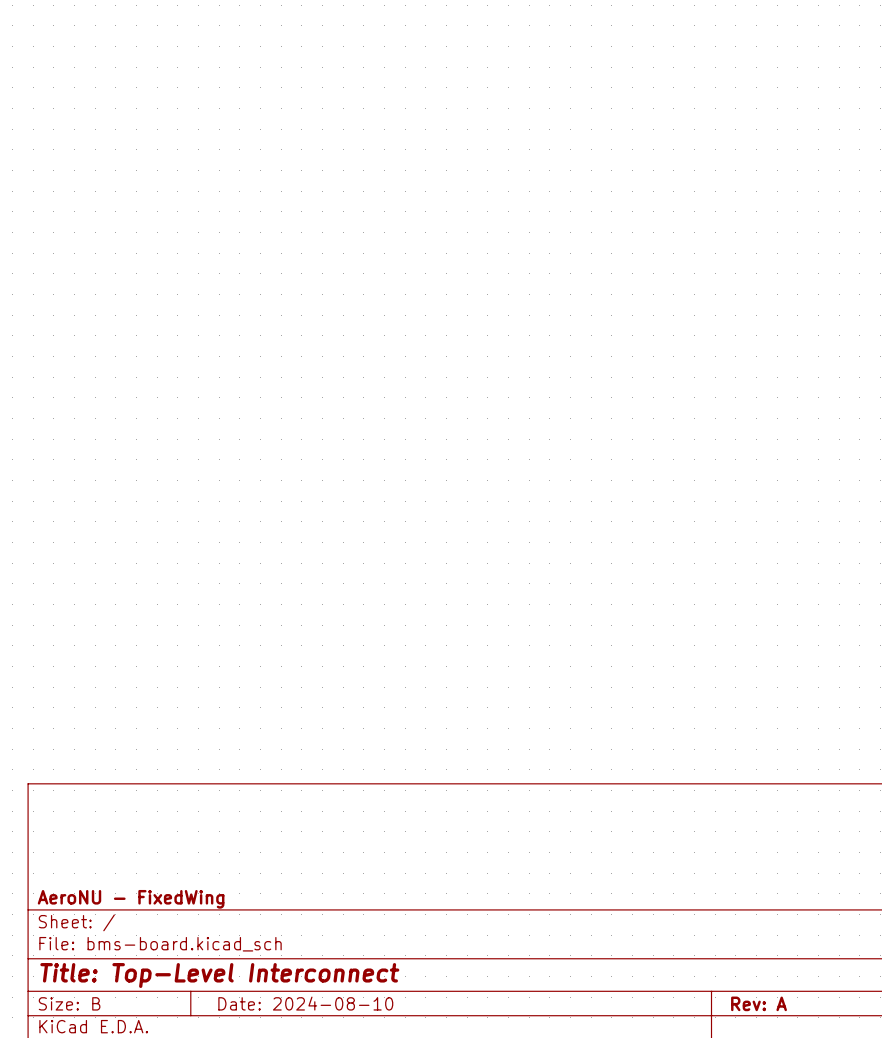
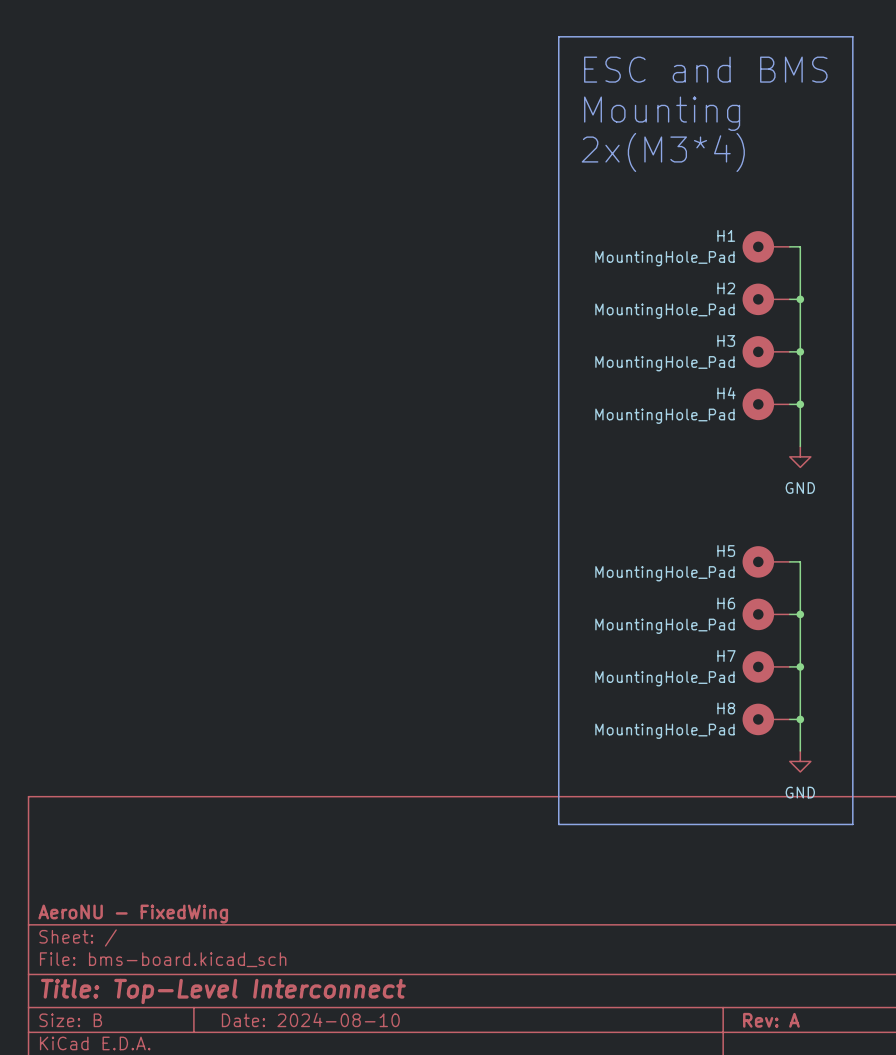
line: none -> (558, 36) (852, 36) (852, 824) (558, 824) (558, 36)
text: none -> ESC and BMS (705, 69)
text: none -> Mounting (662, 113)
text: none -> 2x(M3*4) (663, 152)
H1: none -> MountingHole_Pad (766, 246)
wire: none -> (789, 246) (800, 246) (800, 446)
H2: none -> MountingHole_Pad (766, 299)
wire: none -> (789, 299) (800, 299)
junction: none -> (800, 299)
H3: none -> MountingHole_Pad (766, 351)
wire: none -> (789, 351) (800, 351)
junction: none -> (800, 351)
H4: none -> MountingHole_Pad (766, 404)
wire: none -> (789, 404) (800, 404)
junction: none -> (800, 404)
power symbol: none -> GND (800, 456)
H5: none -> MountingHole_Pad (766, 561)
wire: none -> (789, 561) (800, 561) (800, 750)
H6: none -> MountingHole_Pad (766, 614)
wire: none -> (789, 614) (800, 614)
junction: none -> (800, 614)
H7: none -> MountingHole_Pad (766, 666)
wire: none -> (789, 666) (800, 666)
junction: none -> (800, 666)
H8: none -> MountingHole_Pad (766, 719)
wire: none -> (789, 719) (800, 719)
junction: none -> (800, 719)
power symbol: none -> GND (800, 761)

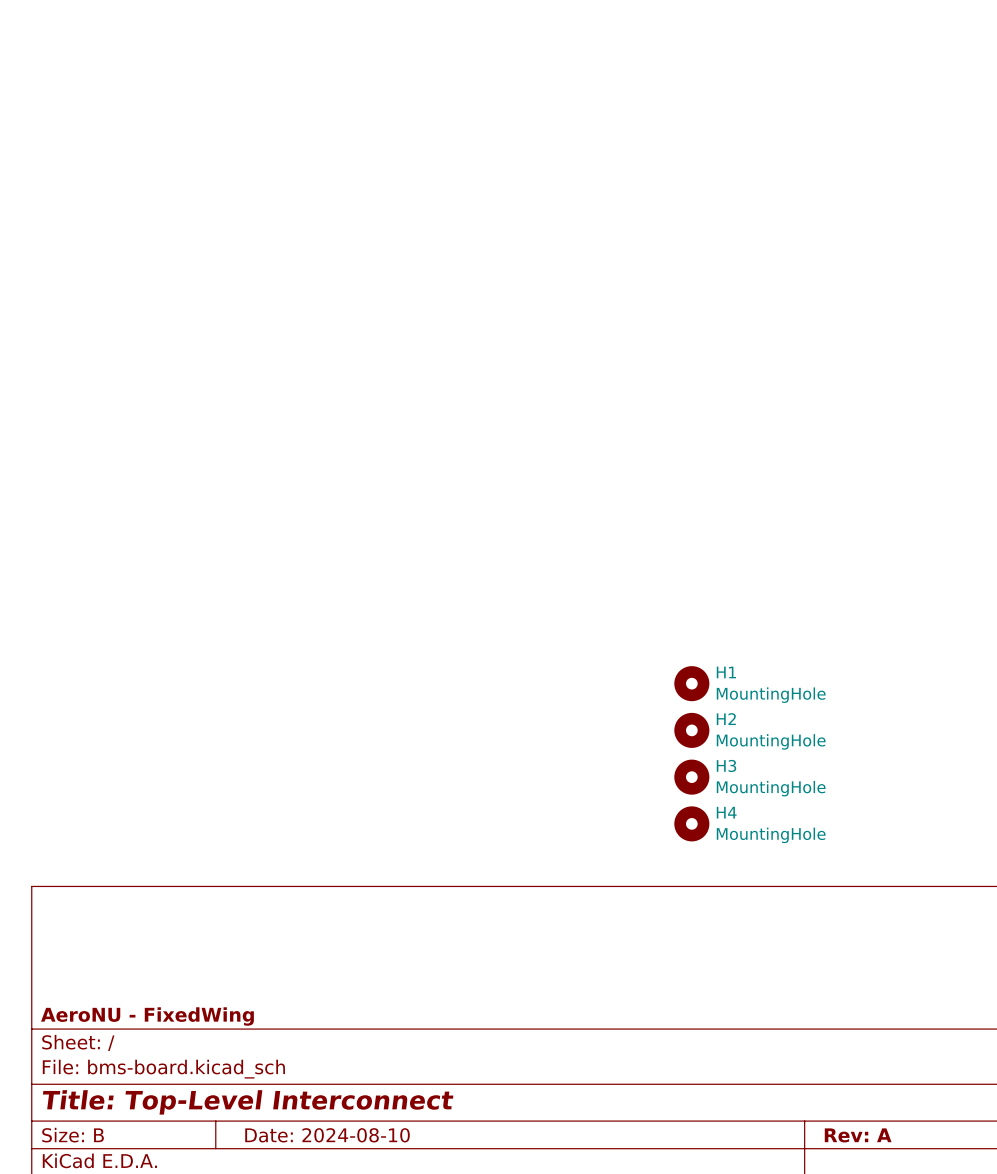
line: (558, 36) (852, 36) (852, 824) (558, 824) (558, 36) -> none
text: ESC and BMS (705, 69) -> none
text: Mounting (662, 113) -> none
text: 2x(M3*4) (663, 152) -> none
H1 symbol: [742, 231, 790, 263] -> [674, 666, 710, 702]
H1 name position: H1 (726, 235) -> H1 (726, 672)
wire: (789, 246) (800, 246) (800, 446) -> none
H1 value: MountingHole_Pad (664, 258) -> MountingHole (771, 695)
H2 symbol: [742, 283, 790, 316] -> [674, 712, 710, 748]
H2 name position: H2 (726, 288) -> H2 (726, 719)
wire: (789, 299) (800, 299) -> none
junction: (800, 299) -> none
H2 value: MountingHole_Pad (664, 311) -> MountingHole (771, 741)
H3 symbol: [742, 336, 790, 368] -> [674, 759, 710, 795]
H3 name position: H3 (726, 340) -> H3 (726, 765)
wire: (789, 351) (800, 351) -> none
junction: (800, 351) -> none
H3 value: MountingHole_Pad (664, 363) -> MountingHole (771, 788)
H4 symbol: [742, 388, 790, 421] -> [674, 806, 710, 842]
H4 name position: H4 (726, 393) -> H4 (726, 812)
wire: (789, 404) (800, 404) -> none
junction: (800, 404) -> none
H4 value: MountingHole_Pad (664, 416) -> MountingHole (771, 835)
power symbol: GND (800, 456) -> none
H5: MountingHole_Pad (766, 561) -> none
wire: (789, 561) (800, 561) (800, 750) -> none
H6: MountingHole_Pad (766, 614) -> none
wire: (789, 614) (800, 614) -> none
junction: (800, 614) -> none
H7: MountingHole_Pad (766, 666) -> none
wire: (789, 666) (800, 666) -> none
junction: (800, 666) -> none
H8: MountingHole_Pad (766, 719) -> none
wire: (789, 719) (800, 719) -> none
junction: (800, 719) -> none
power symbol: GND (800, 761) -> none

